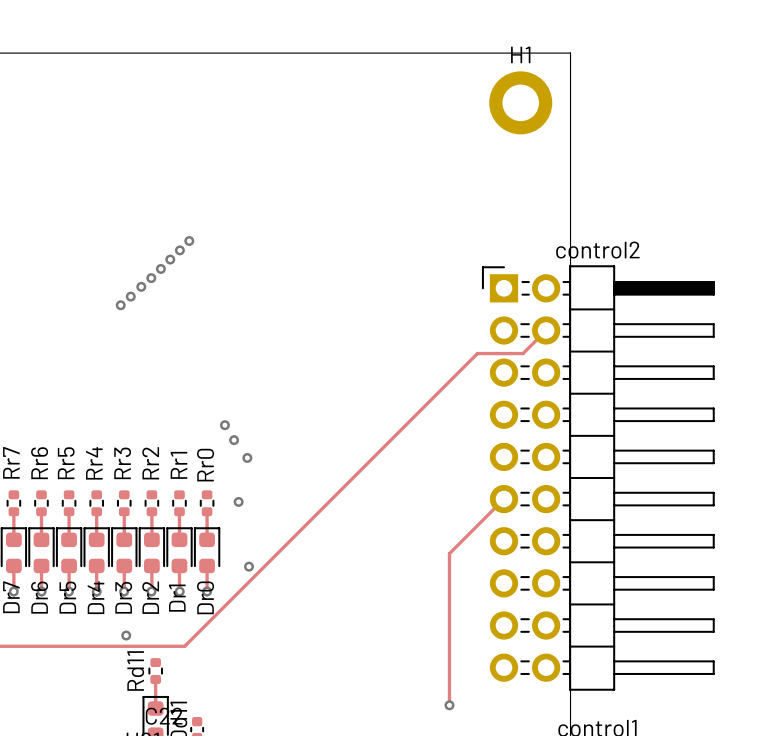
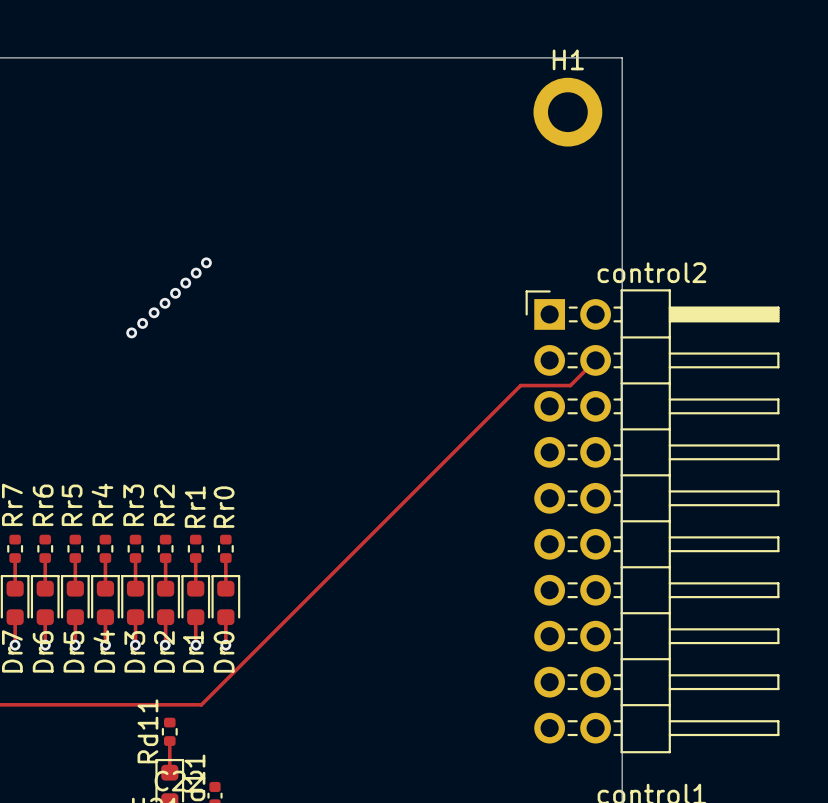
via: (224, 425) -> none
via: (234, 440) -> none
via: (247, 457) -> none
track: (504, 499) (449, 553) (449, 705) -> none
via: (238, 501) -> none
via: (249, 566) -> none
via: (126, 635) -> none
via: (449, 705) -> none

